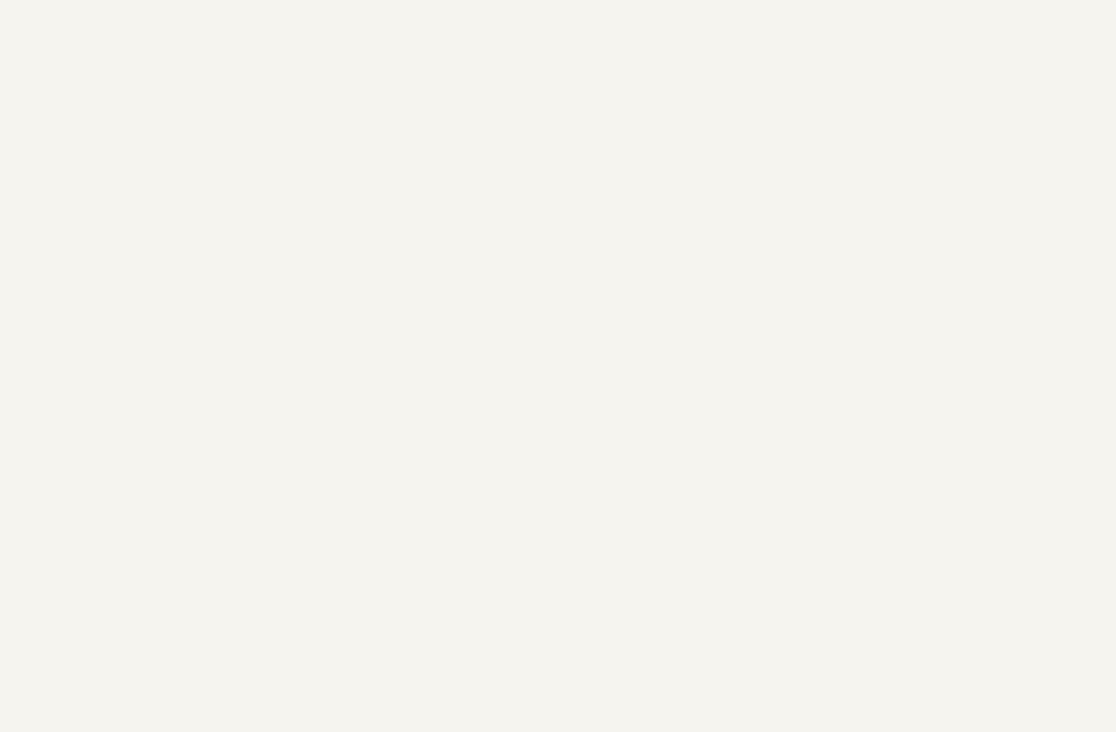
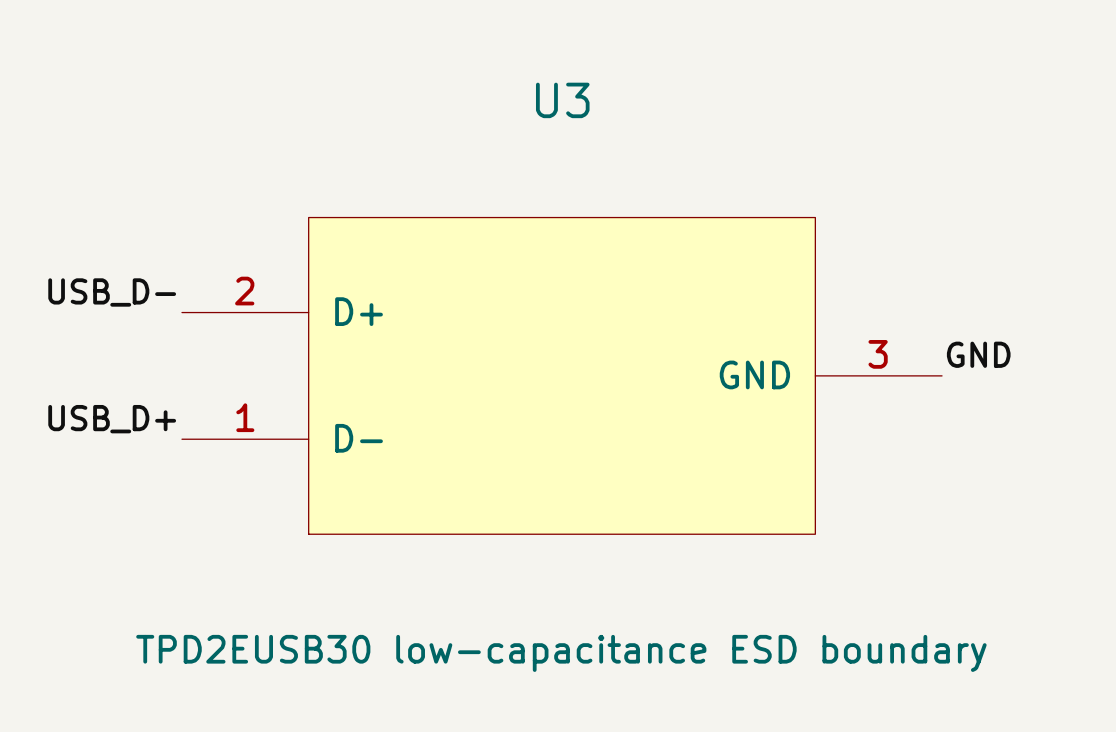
label: none -> USB_D- (112, 292)
label: none -> GND (978, 354)
U3: none -> TPD2EUSB30 low-capacitance ESD boundary (562, 375)
label: none -> USB_D+ (112, 419)

